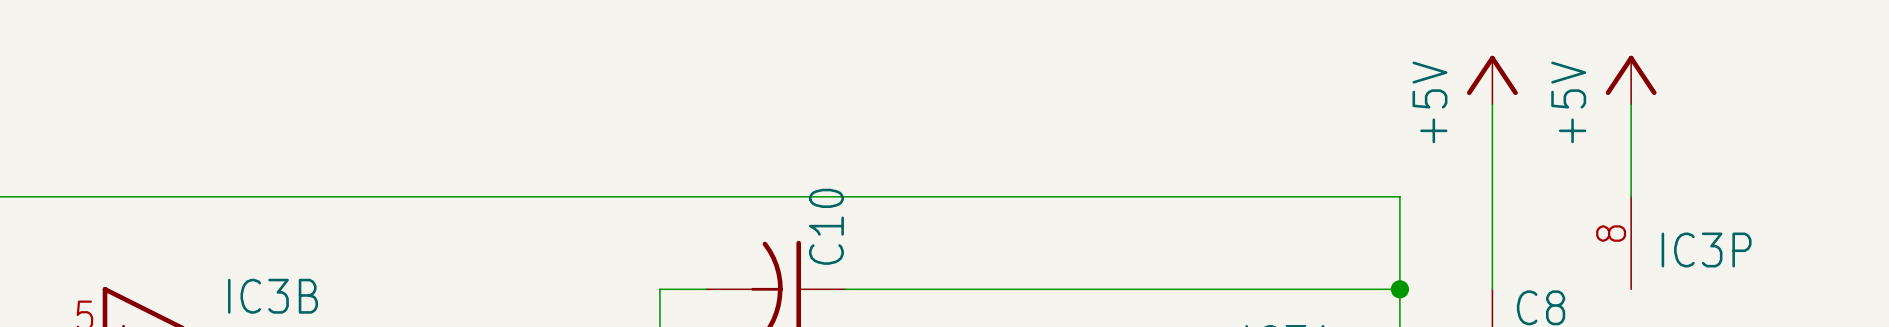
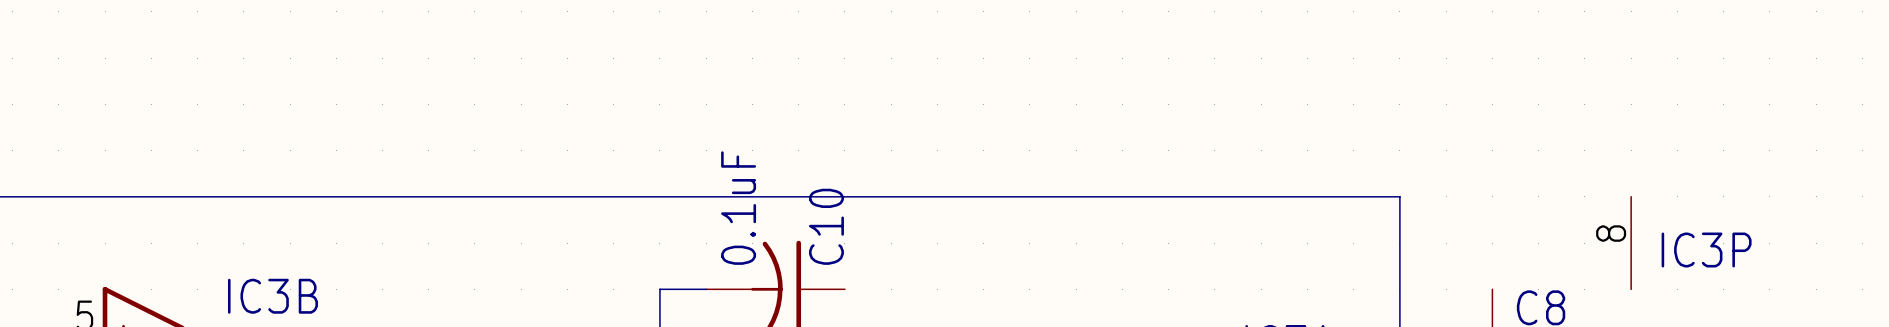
power symbol: +5V (1492, 80) -> none
power symbol: +5V (1631, 80) -> none
wire: (1492, 104) (1492, 289) -> none
wire: (1631, 104) (1631, 196) -> none
C10 value: none -> 0.1uF (738, 208)
wire: (844, 289) (1399, 289) -> none
junction: (1399, 289) -> none

